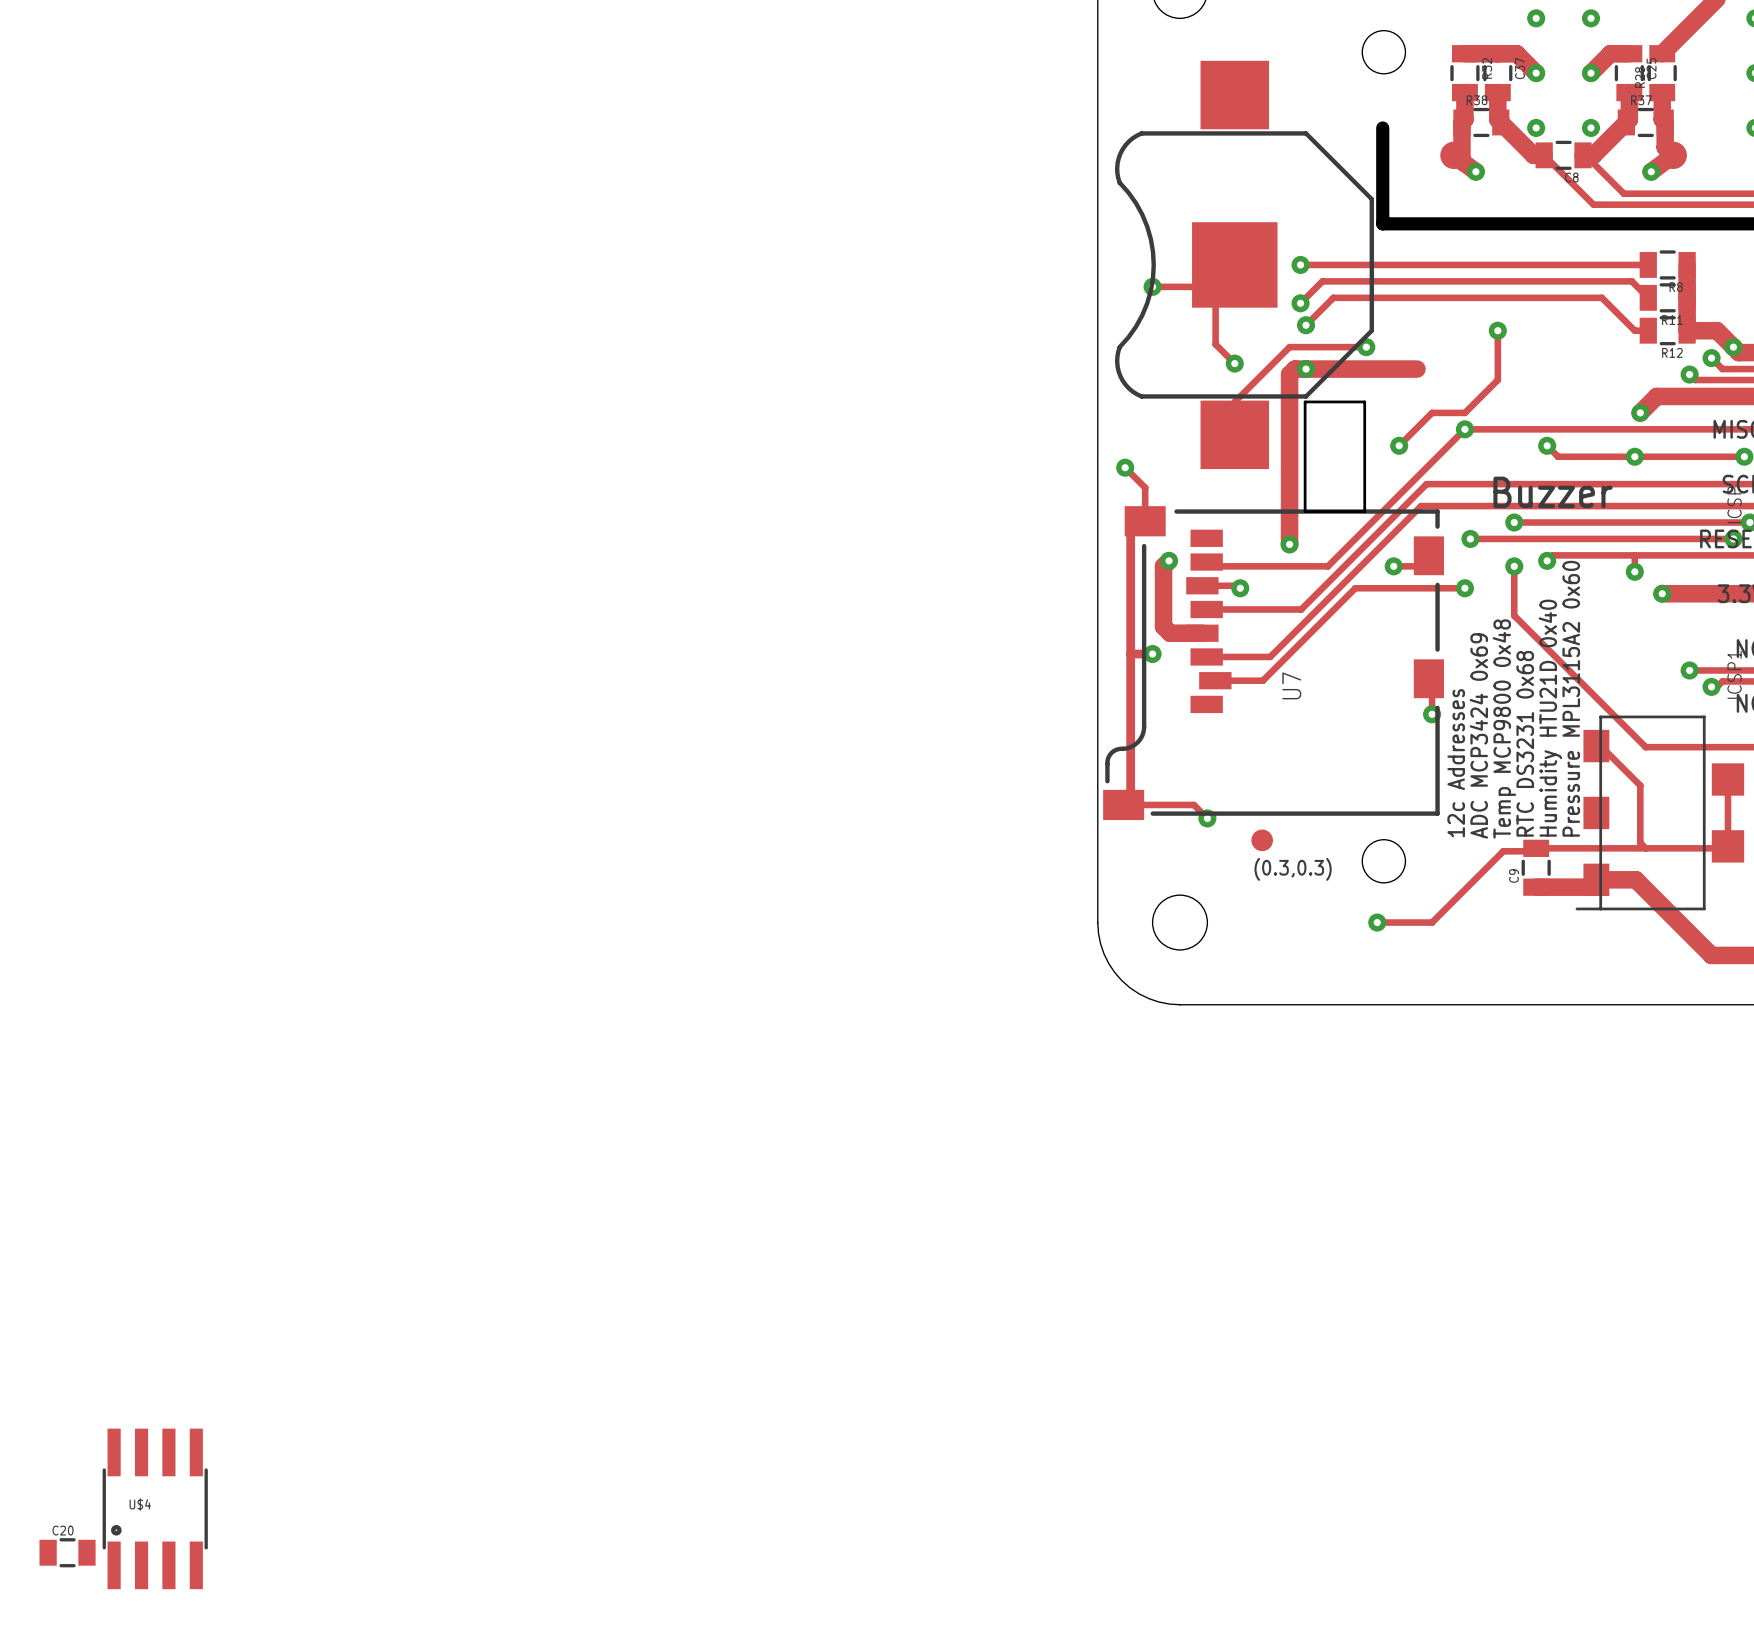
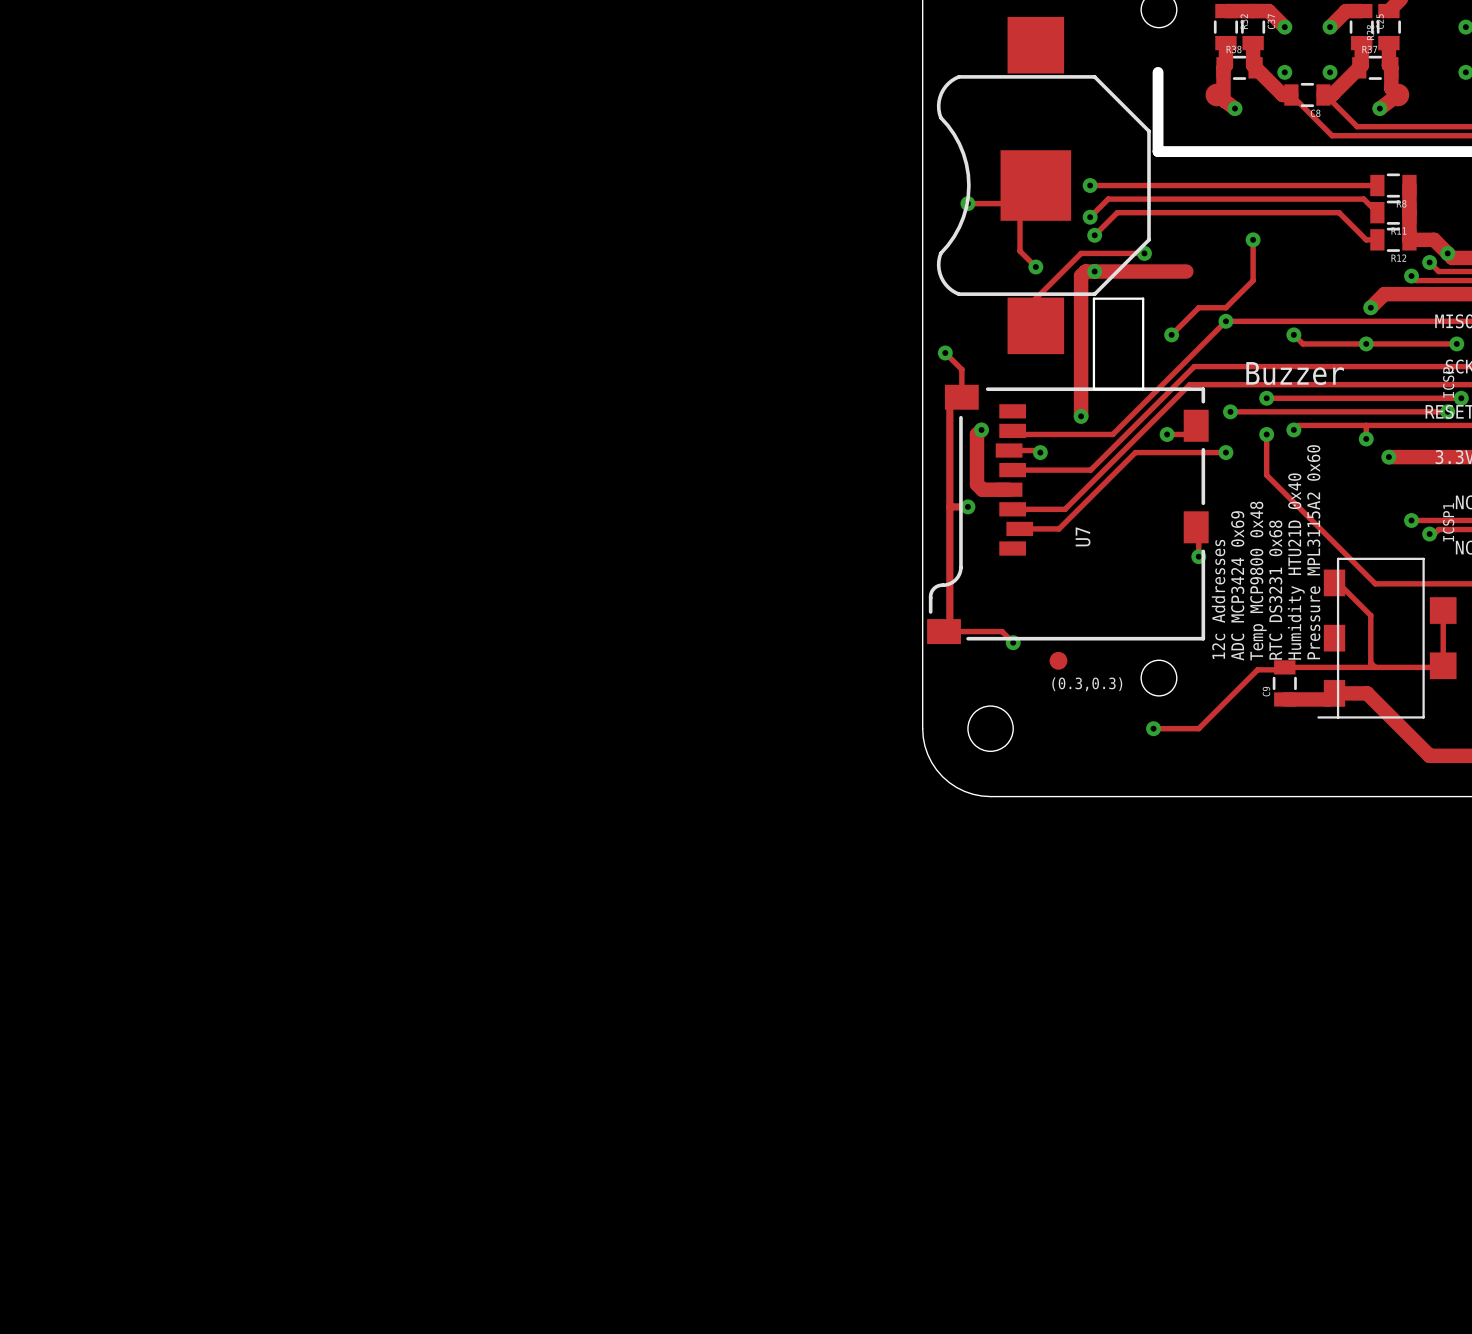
U$4: (155, 1508) -> none
C20: (67, 1552) -> none

